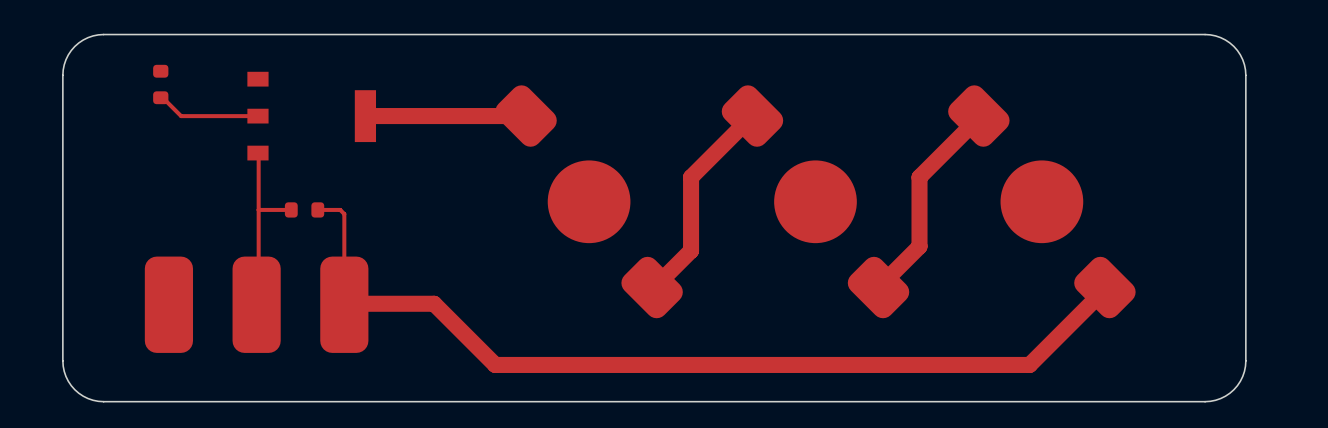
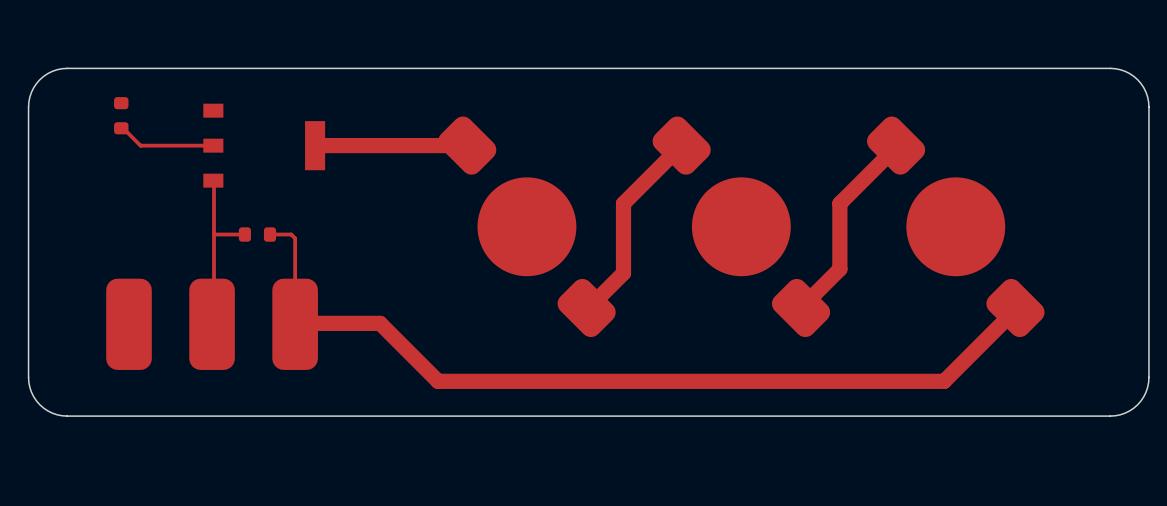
part footprint: [495, 85, 683, 319] -> [438, 116, 616, 338]
part footprint: [721, 85, 910, 319] -> [652, 116, 831, 338]
part footprint: [948, 85, 1136, 319] -> [867, 116, 1045, 338]

